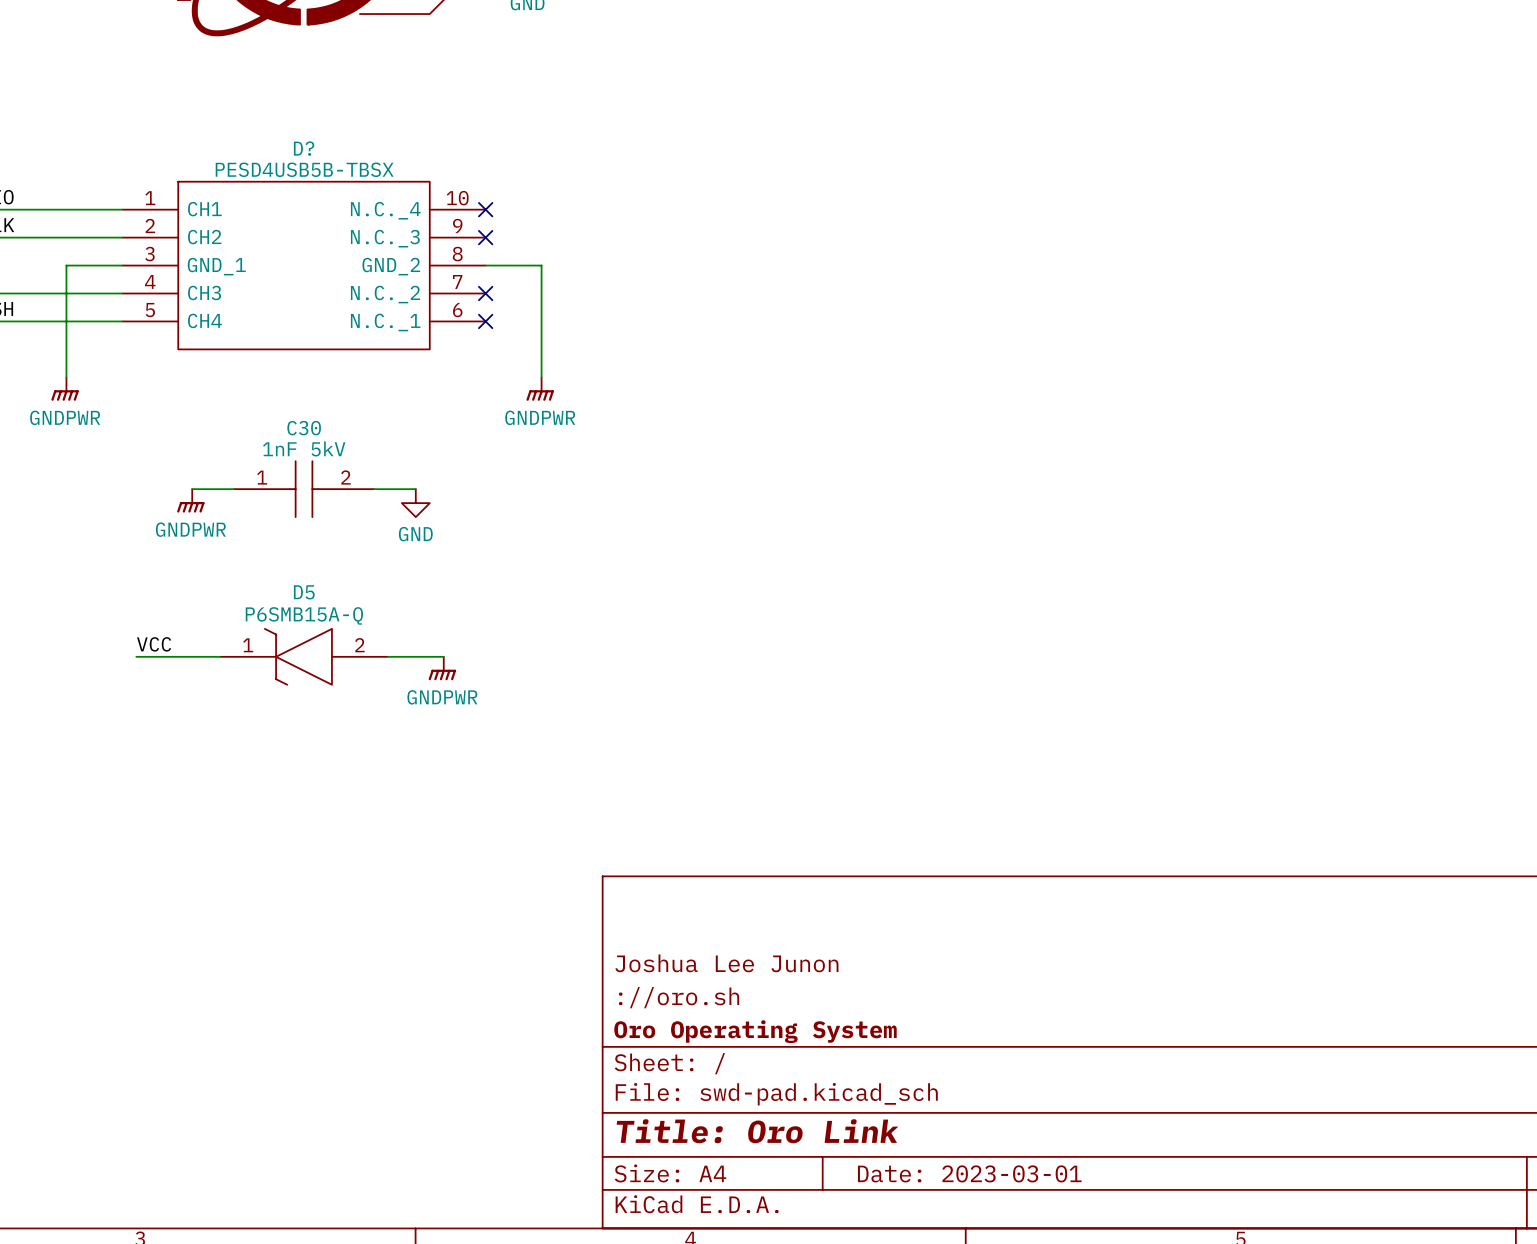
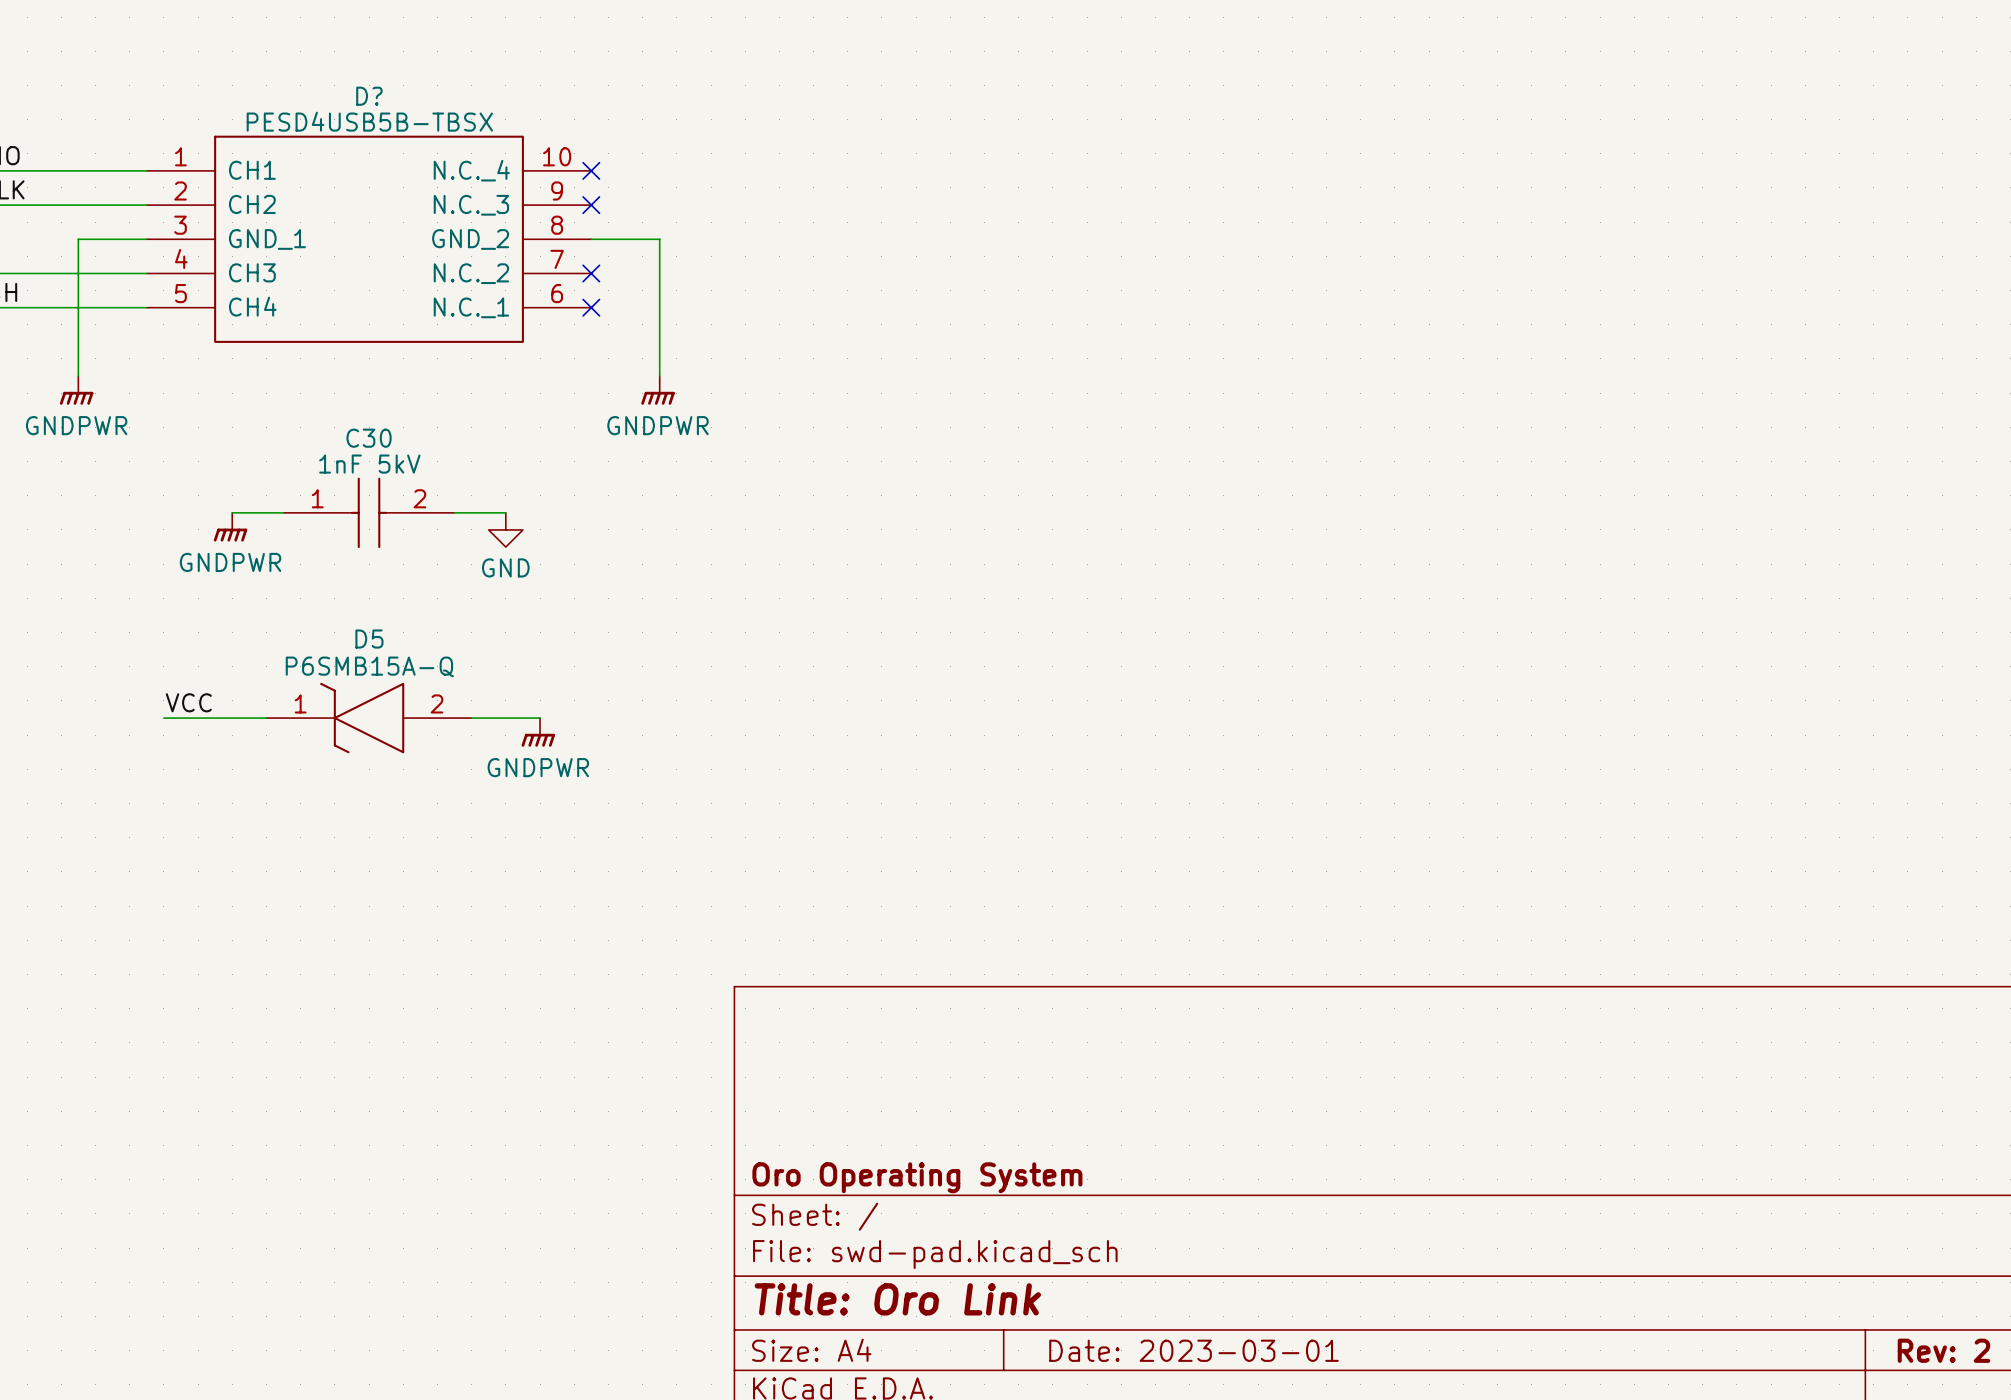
title block: Joshua Lee Junon (726, 963) -> none
title block: ://oro.sh (679, 997) -> none

